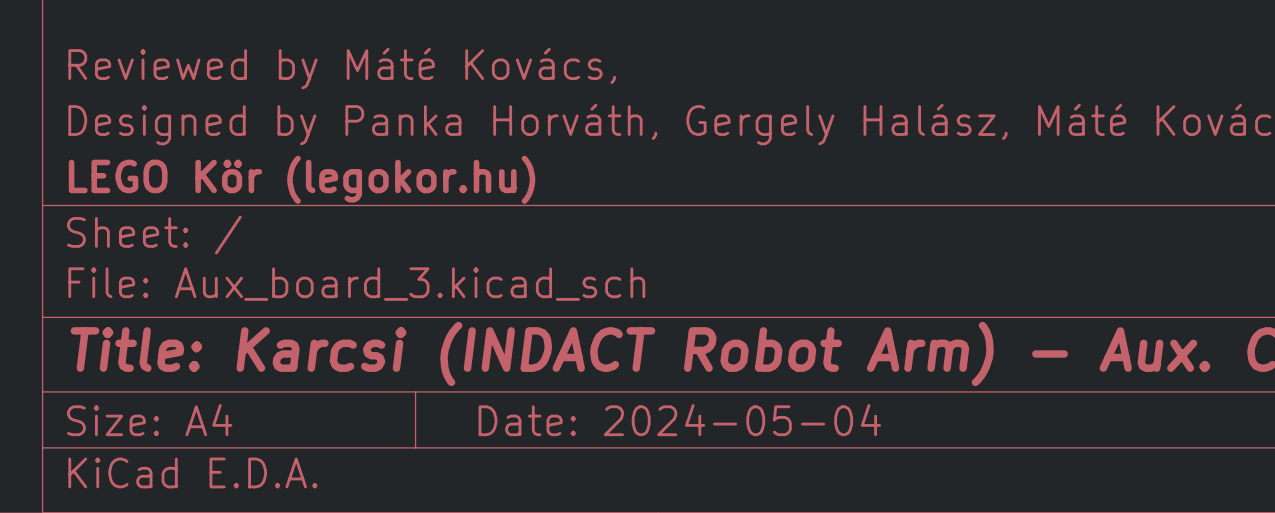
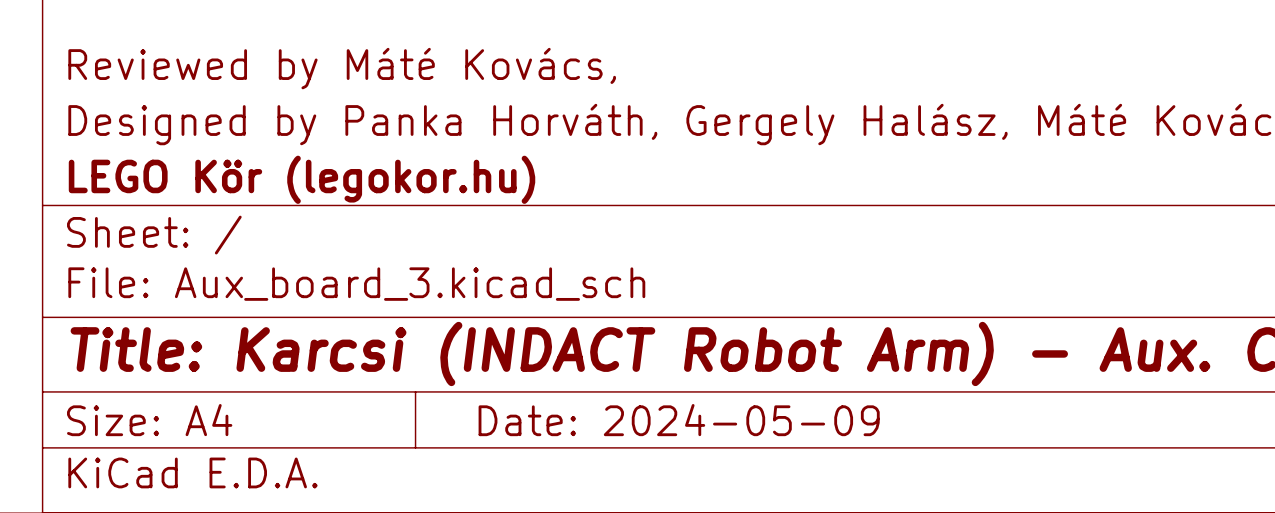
title block: Date: 2024-05-04 (679, 420) -> Date: 2024-05-09 (679, 420)

